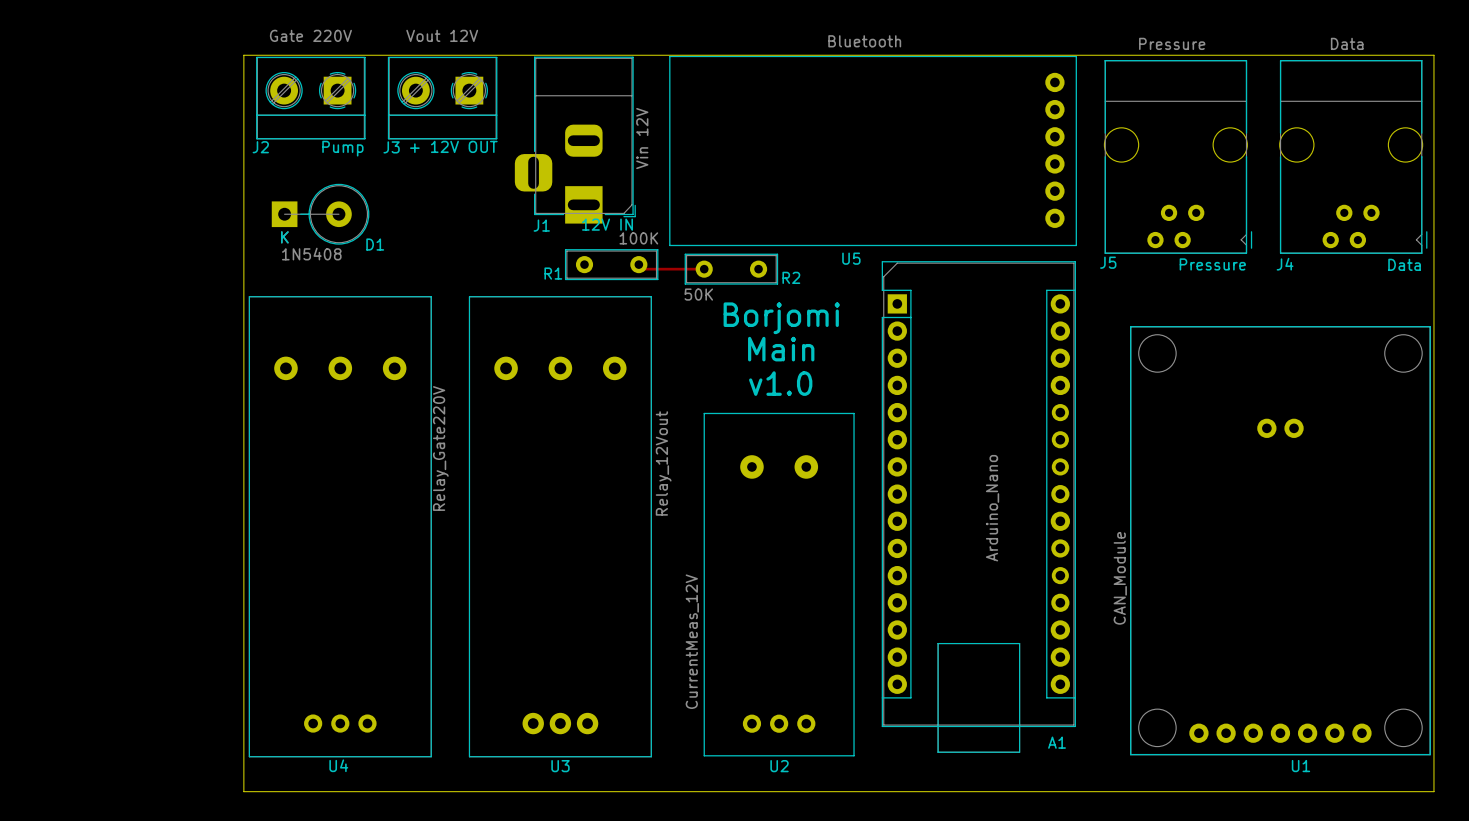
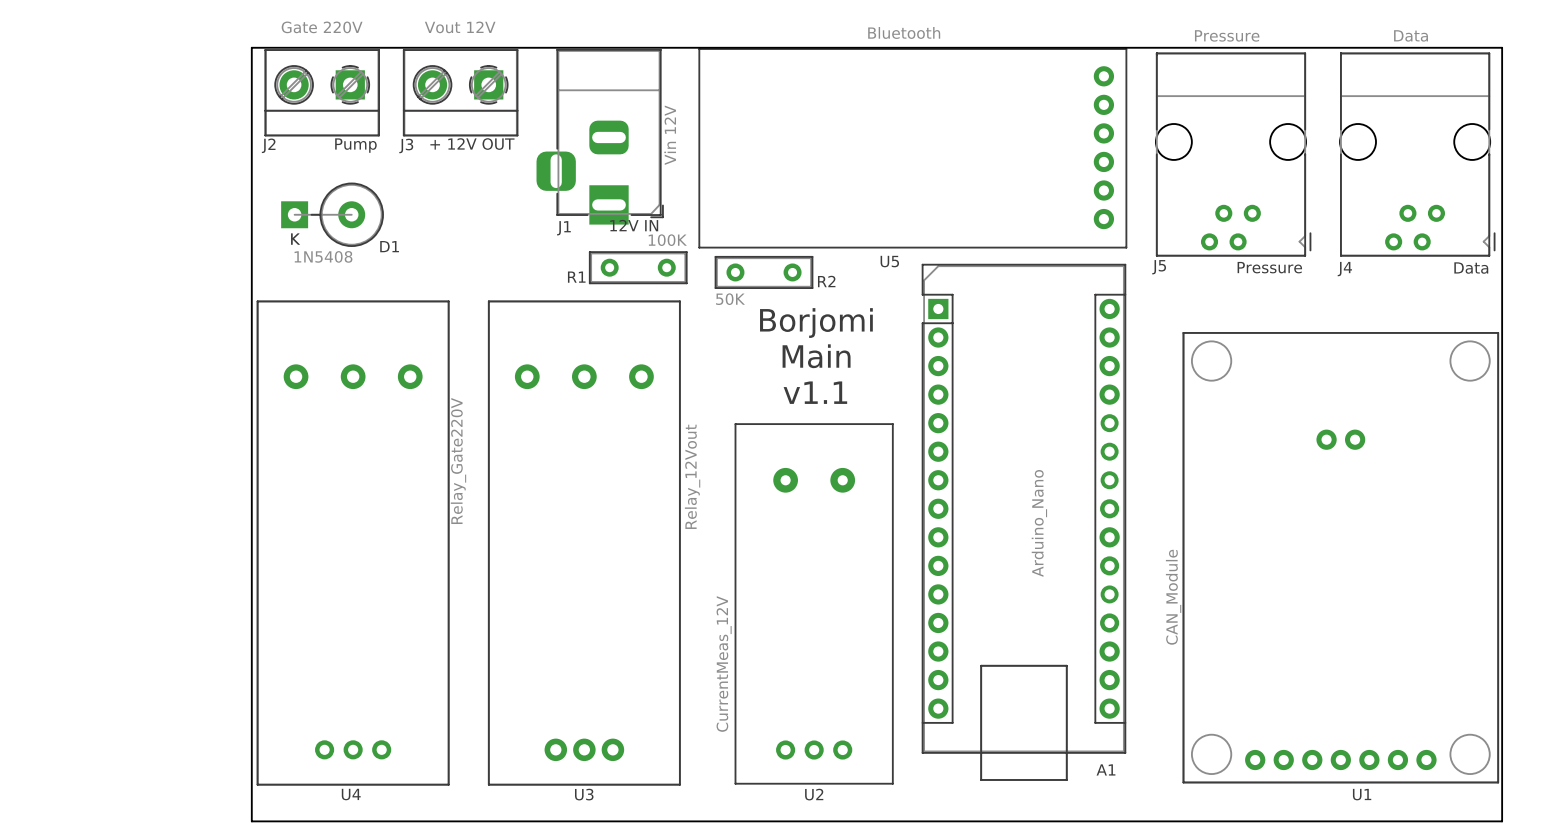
track: (643, 269) (704, 269) -> none
text: v1.0 (780, 383) -> v1.1 (815, 392)

